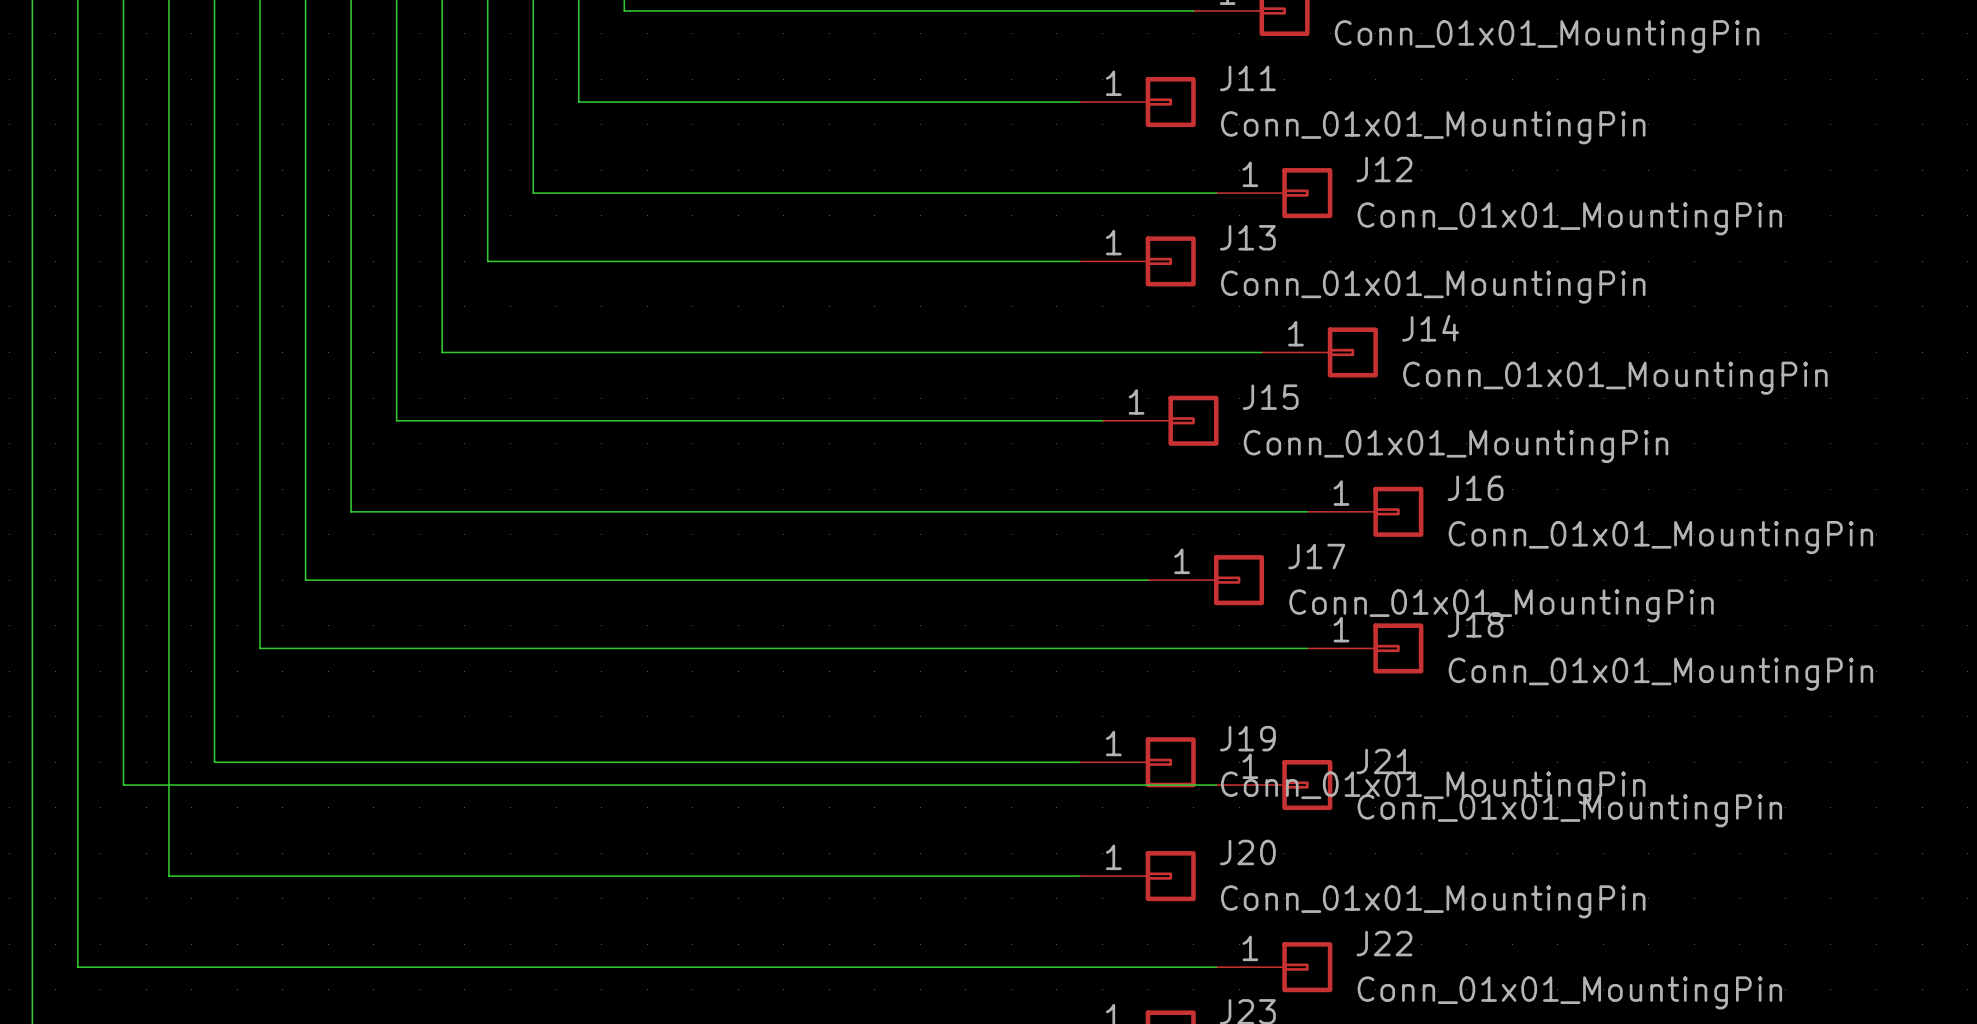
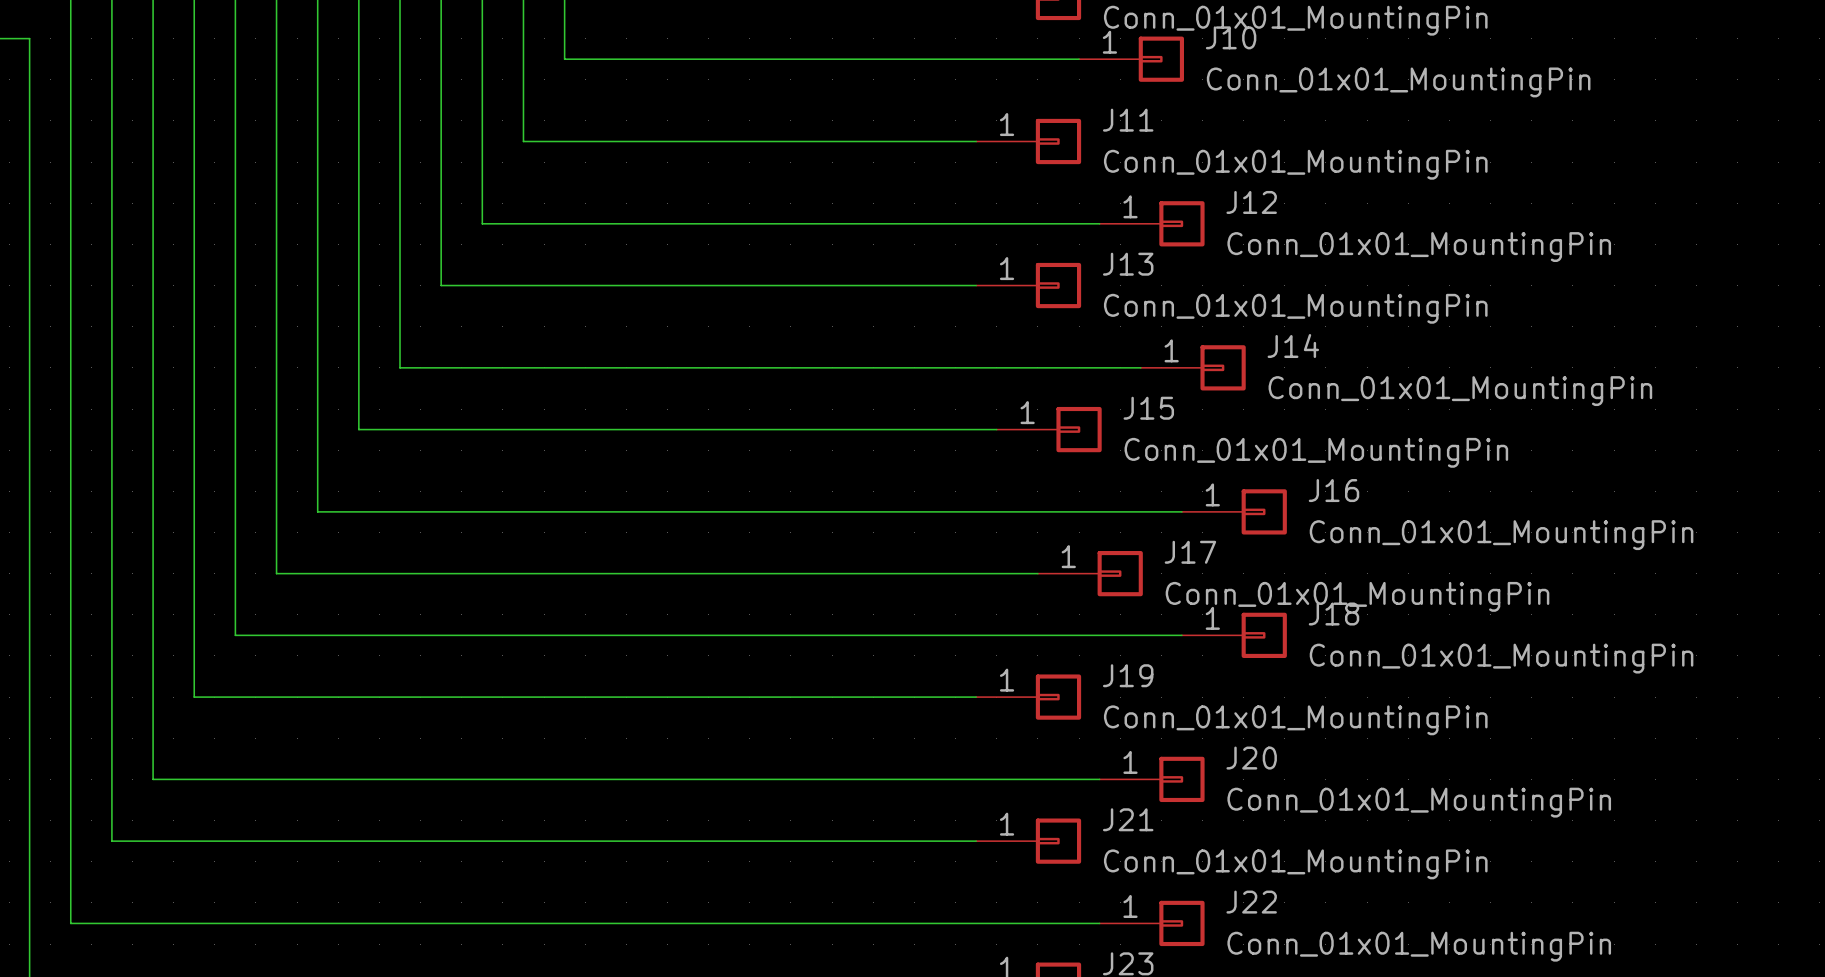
wire: (214, 716) (214, 762) (1079, 762) -> (194, 697) (976, 697)
J19 position: (1137, 762) -> (1028, 697)
wire: (123, 785) (1216, 785) -> none
J21: Conn_01x01_MountingPin (1274, 785) -> none
wire: (168, 807) (168, 876) -> (111, 758) (111, 841) (153, 841)
wire: none -> (153, 779) (1099, 779)
J20: none -> Conn_01x01_MountingPin (1152, 779)
J20 name: J20 (1247, 852) -> J21 (1128, 819)

